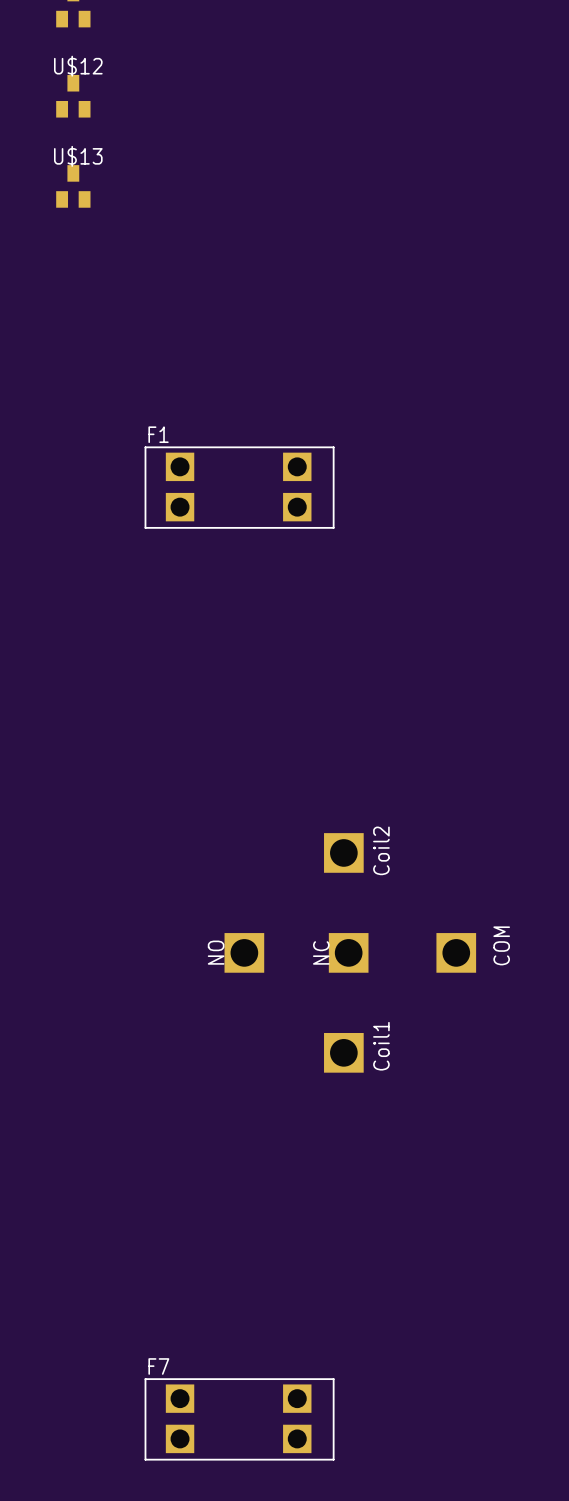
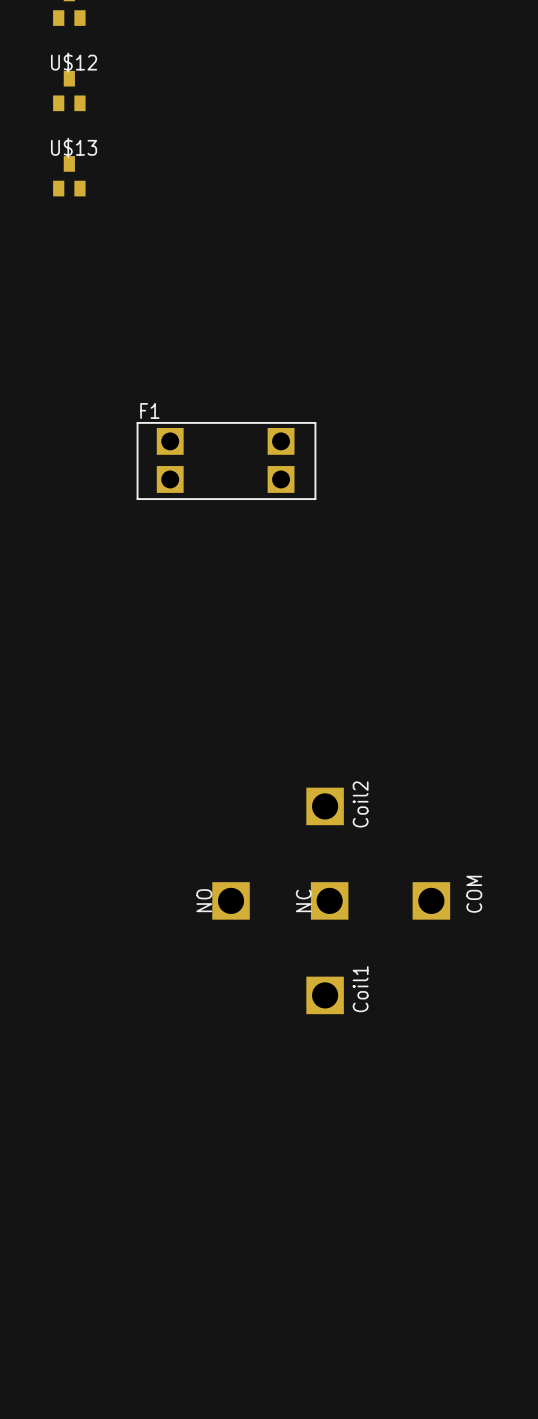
F7: (239, 1419) -> none

